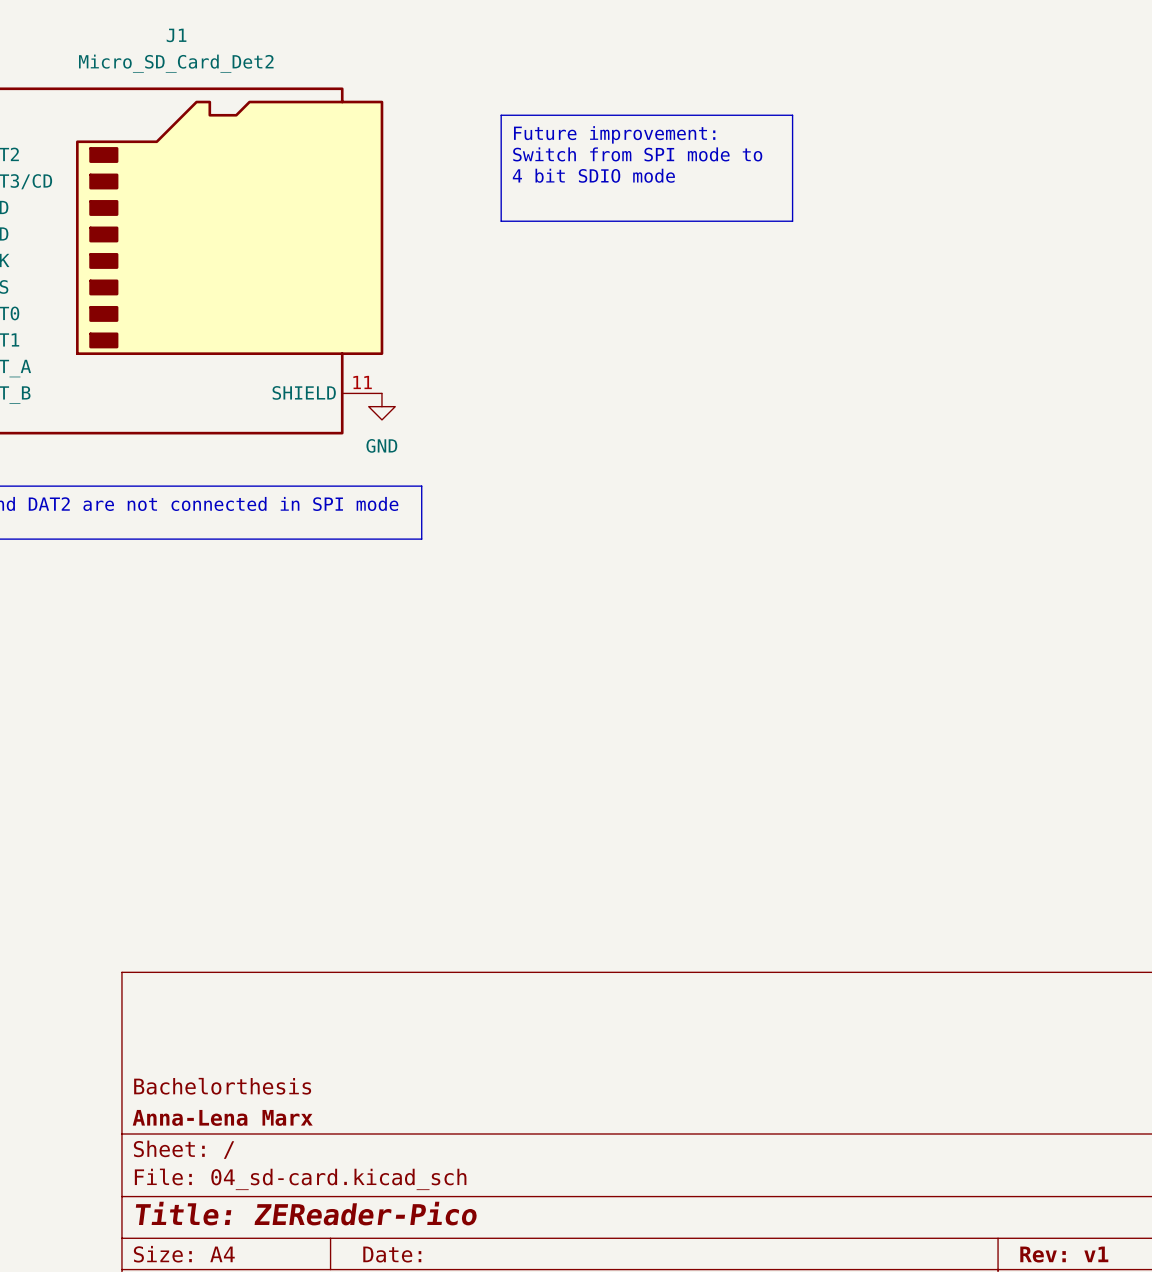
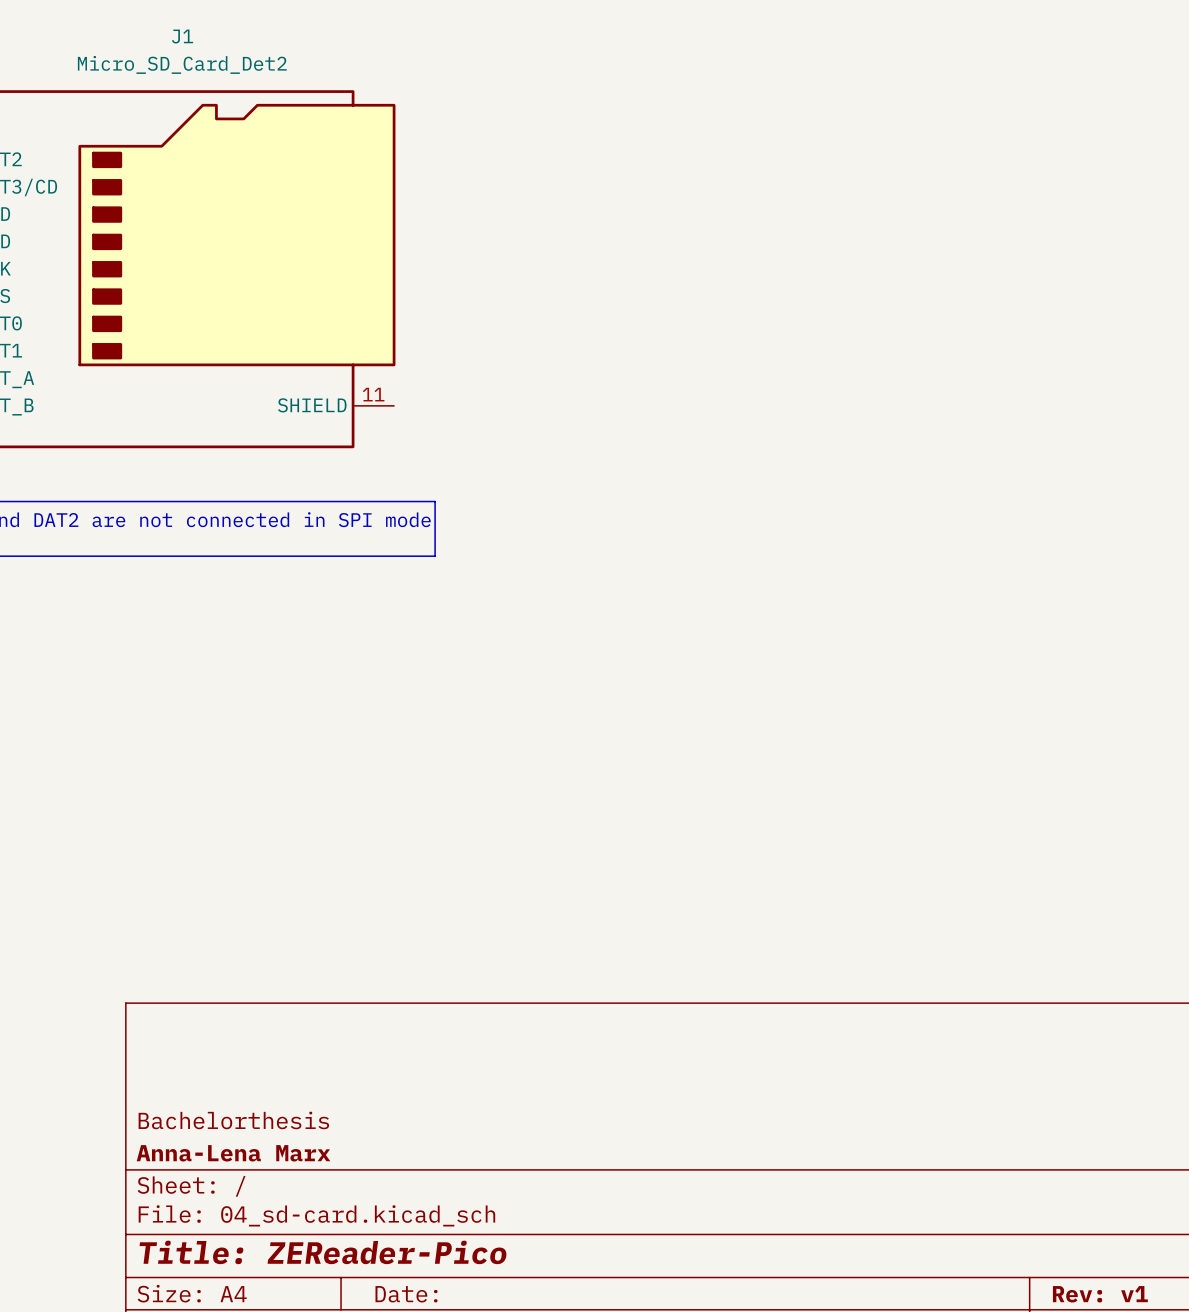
line: (501, 115) (792, 115) (792, 221) (501, 221) (501, 115) -> none
text: Future improvement: (614, 134) -> none
text: Switch from SPI mode to (637, 154) -> none
text: 4 bit SDIO mode (593, 175) -> none
power symbol: GND (381, 406) -> none

